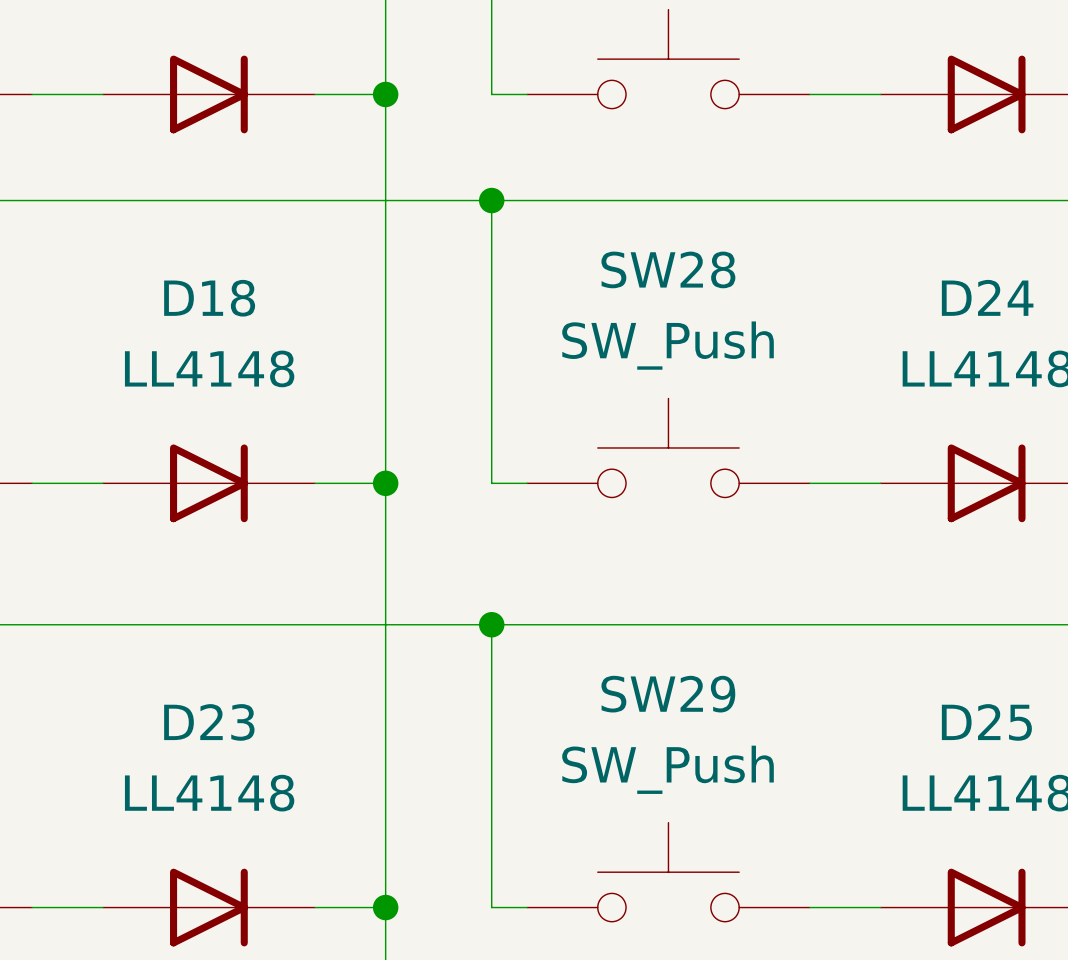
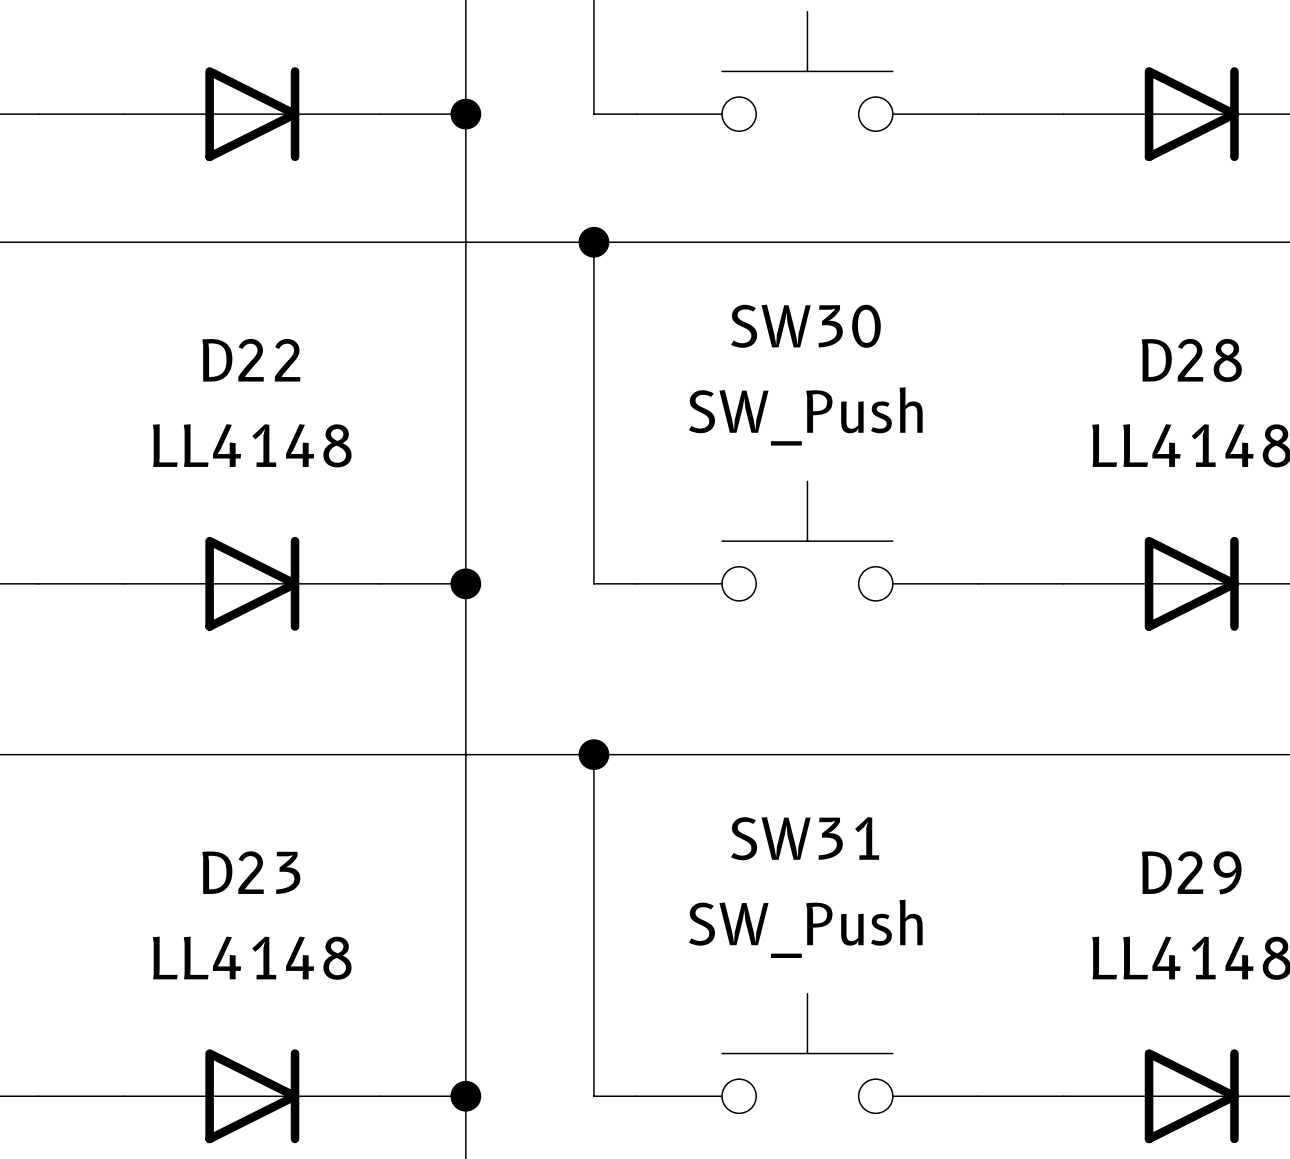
SW28 name: SW28 (668, 269) -> SW30 (805, 326)
D24 name: D24 (987, 297) -> D28 (1191, 360)
D18 name: D18 (209, 298) -> D22 (251, 360)
SW29 name: SW29 (668, 694) -> SW31 (805, 838)
D25 name: D25 (986, 722) -> D29 (1191, 872)

